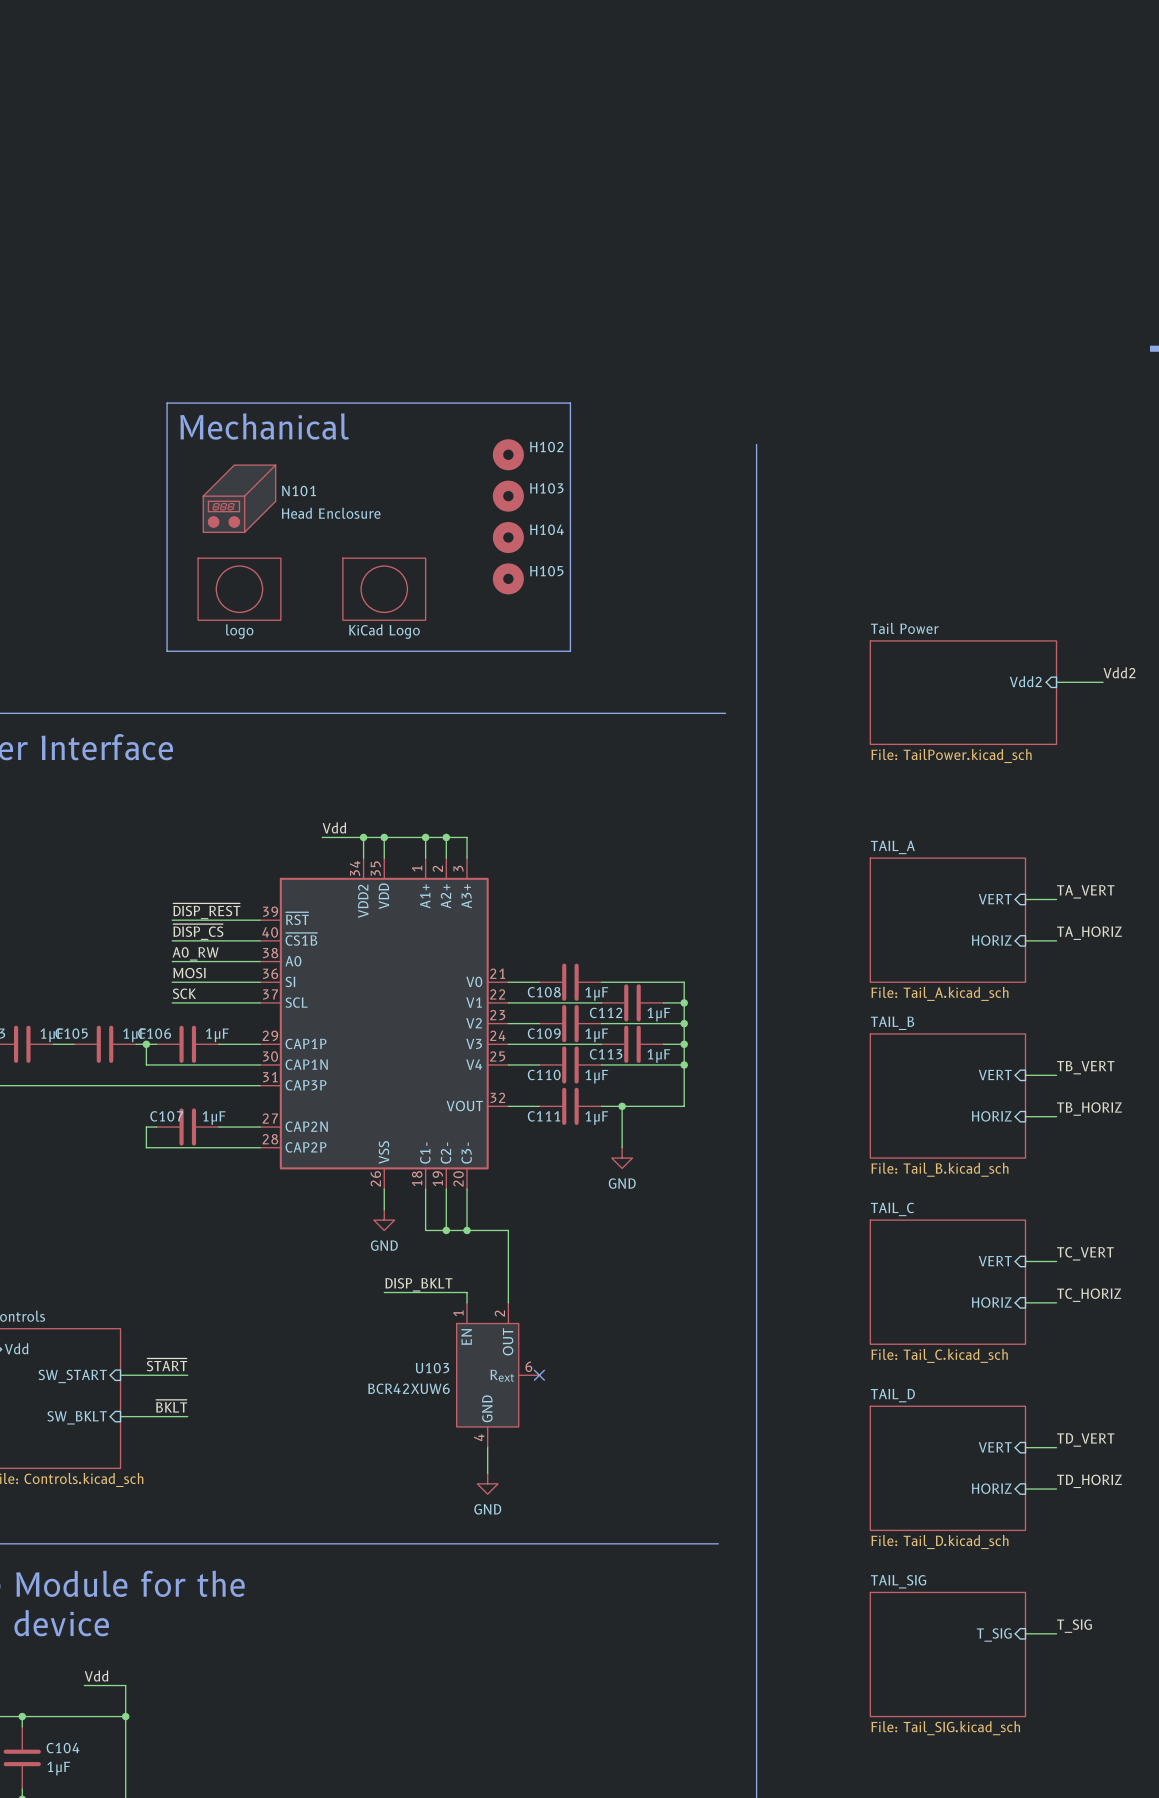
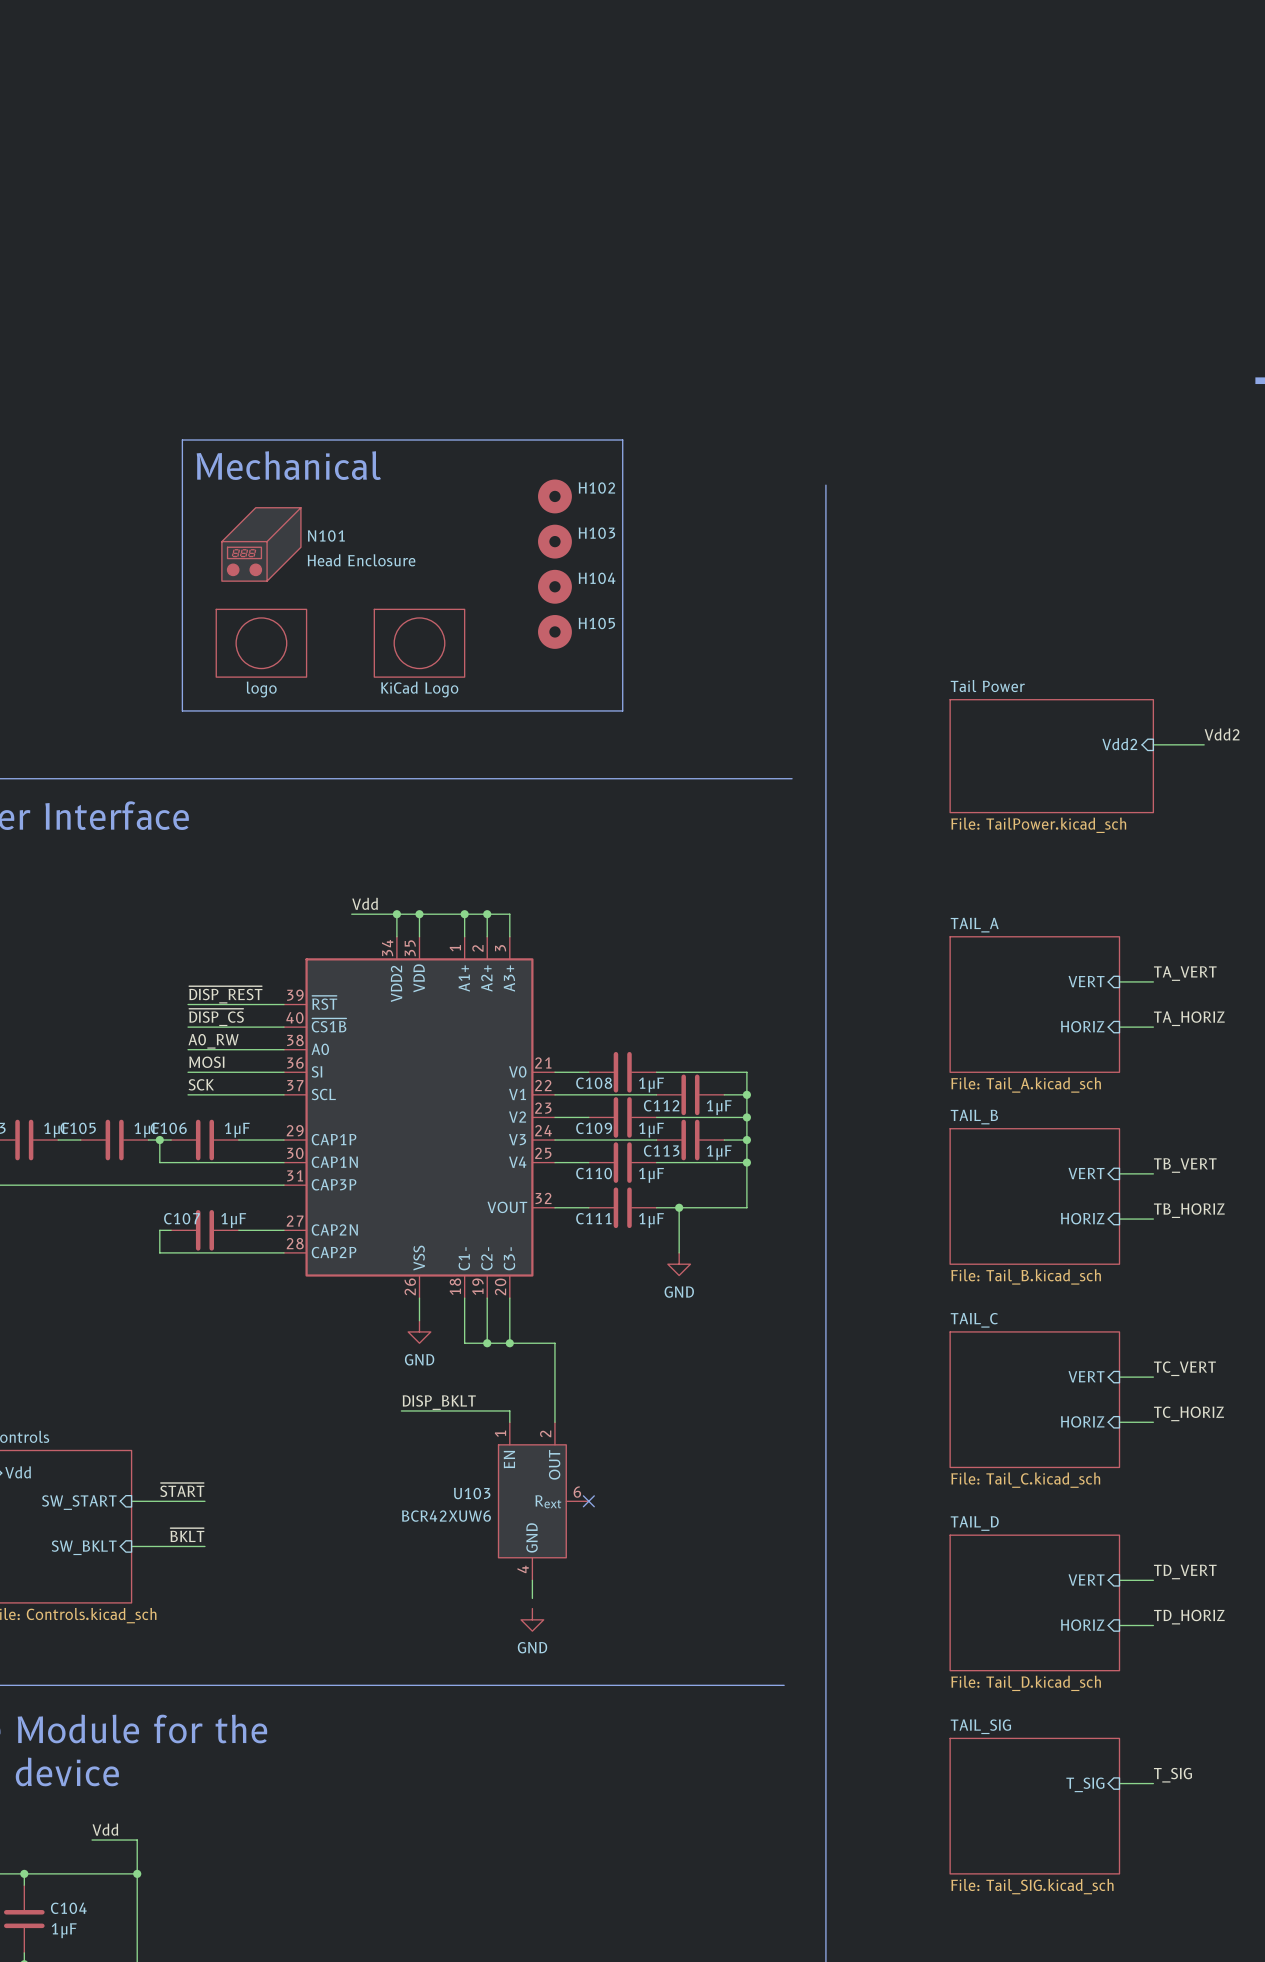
label position: DISP_BKLT (418, 1284) -> DISP_BKLT (439, 1402)
wire: none -> (401, 1410) (419, 1410)
wire: (487, 1464) (487, 1473) -> none

